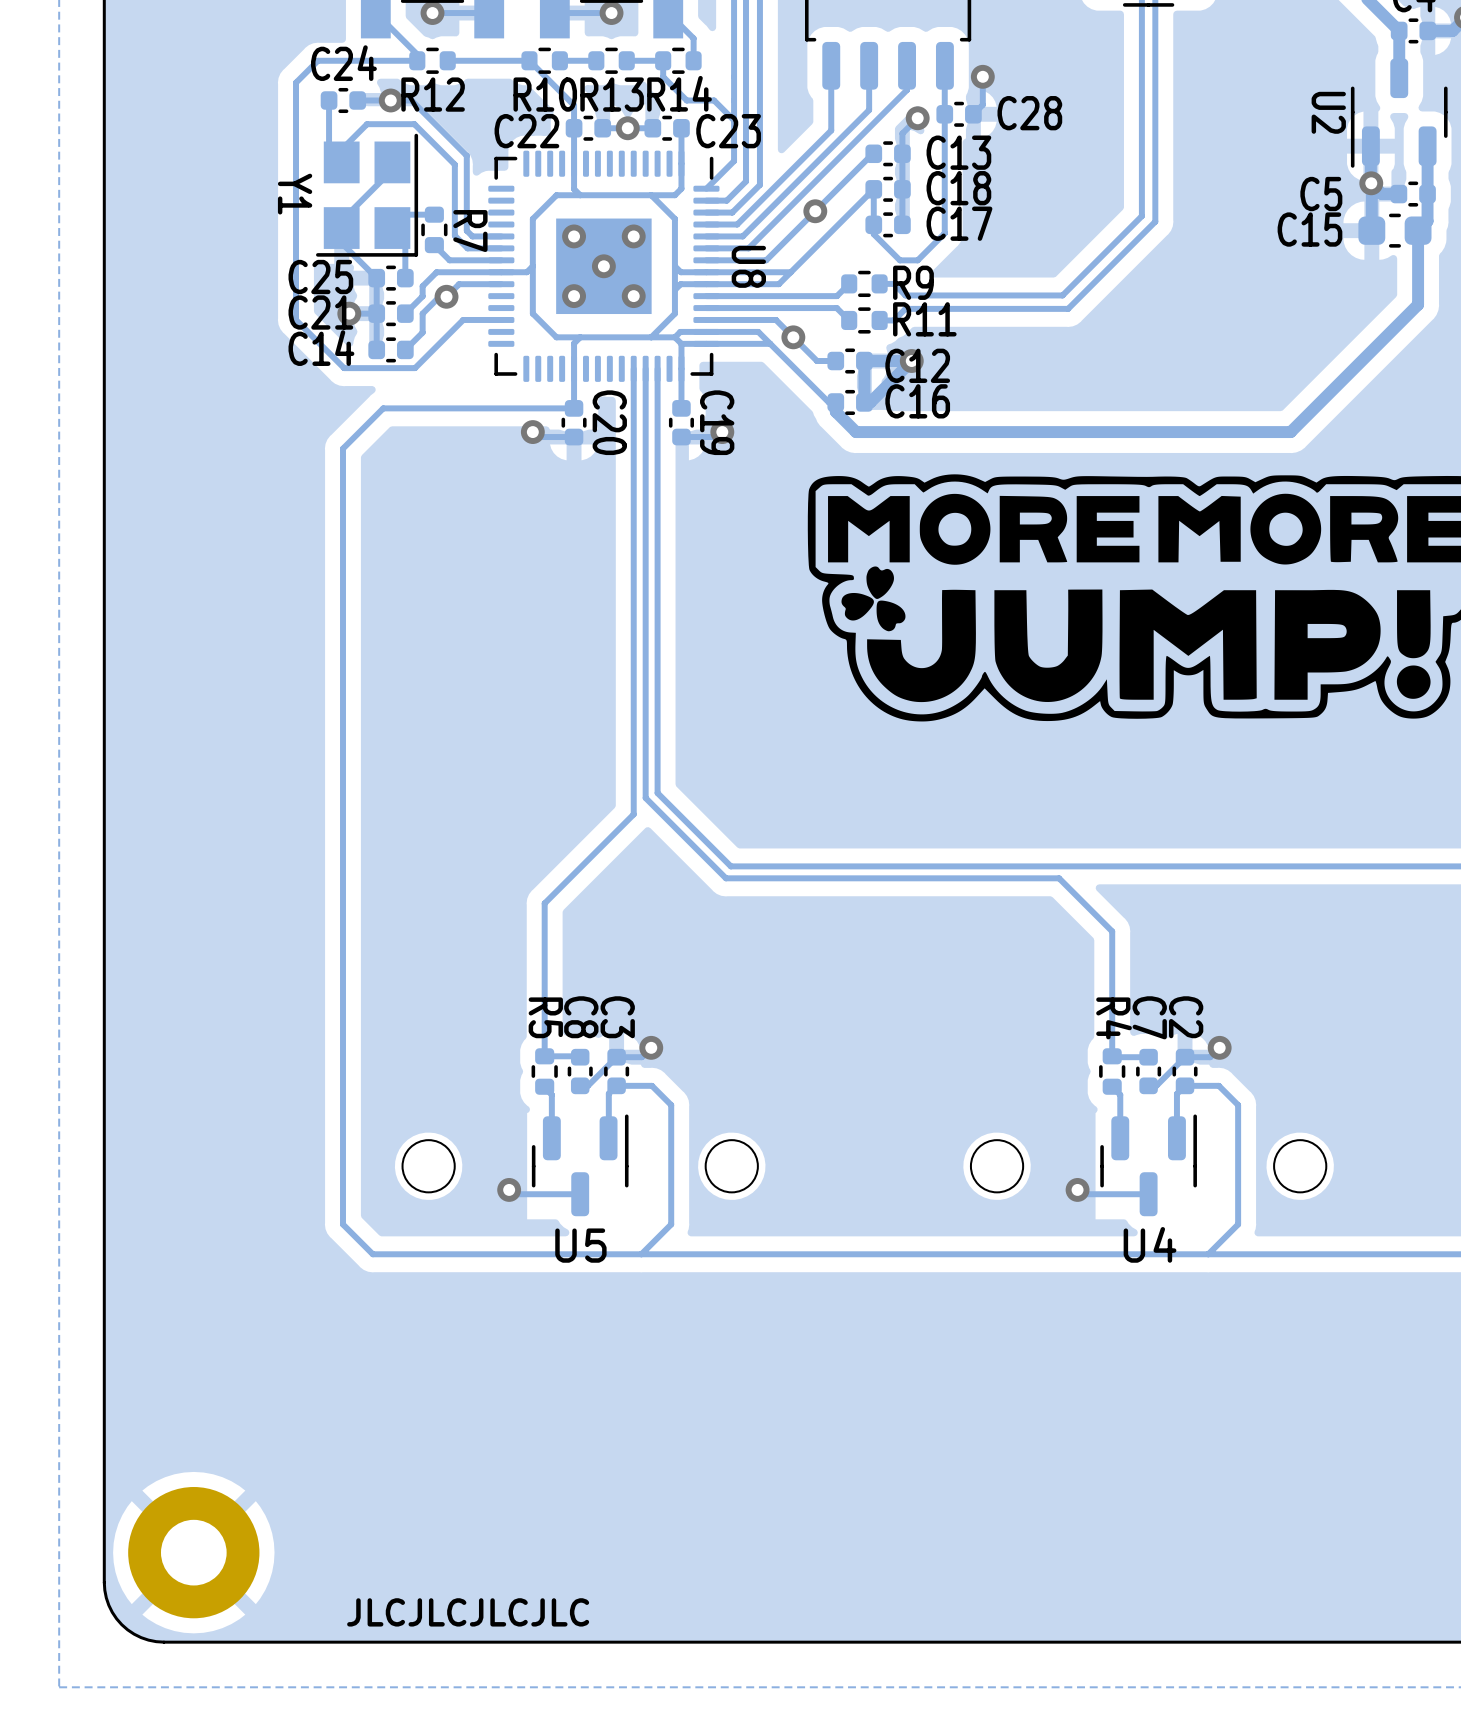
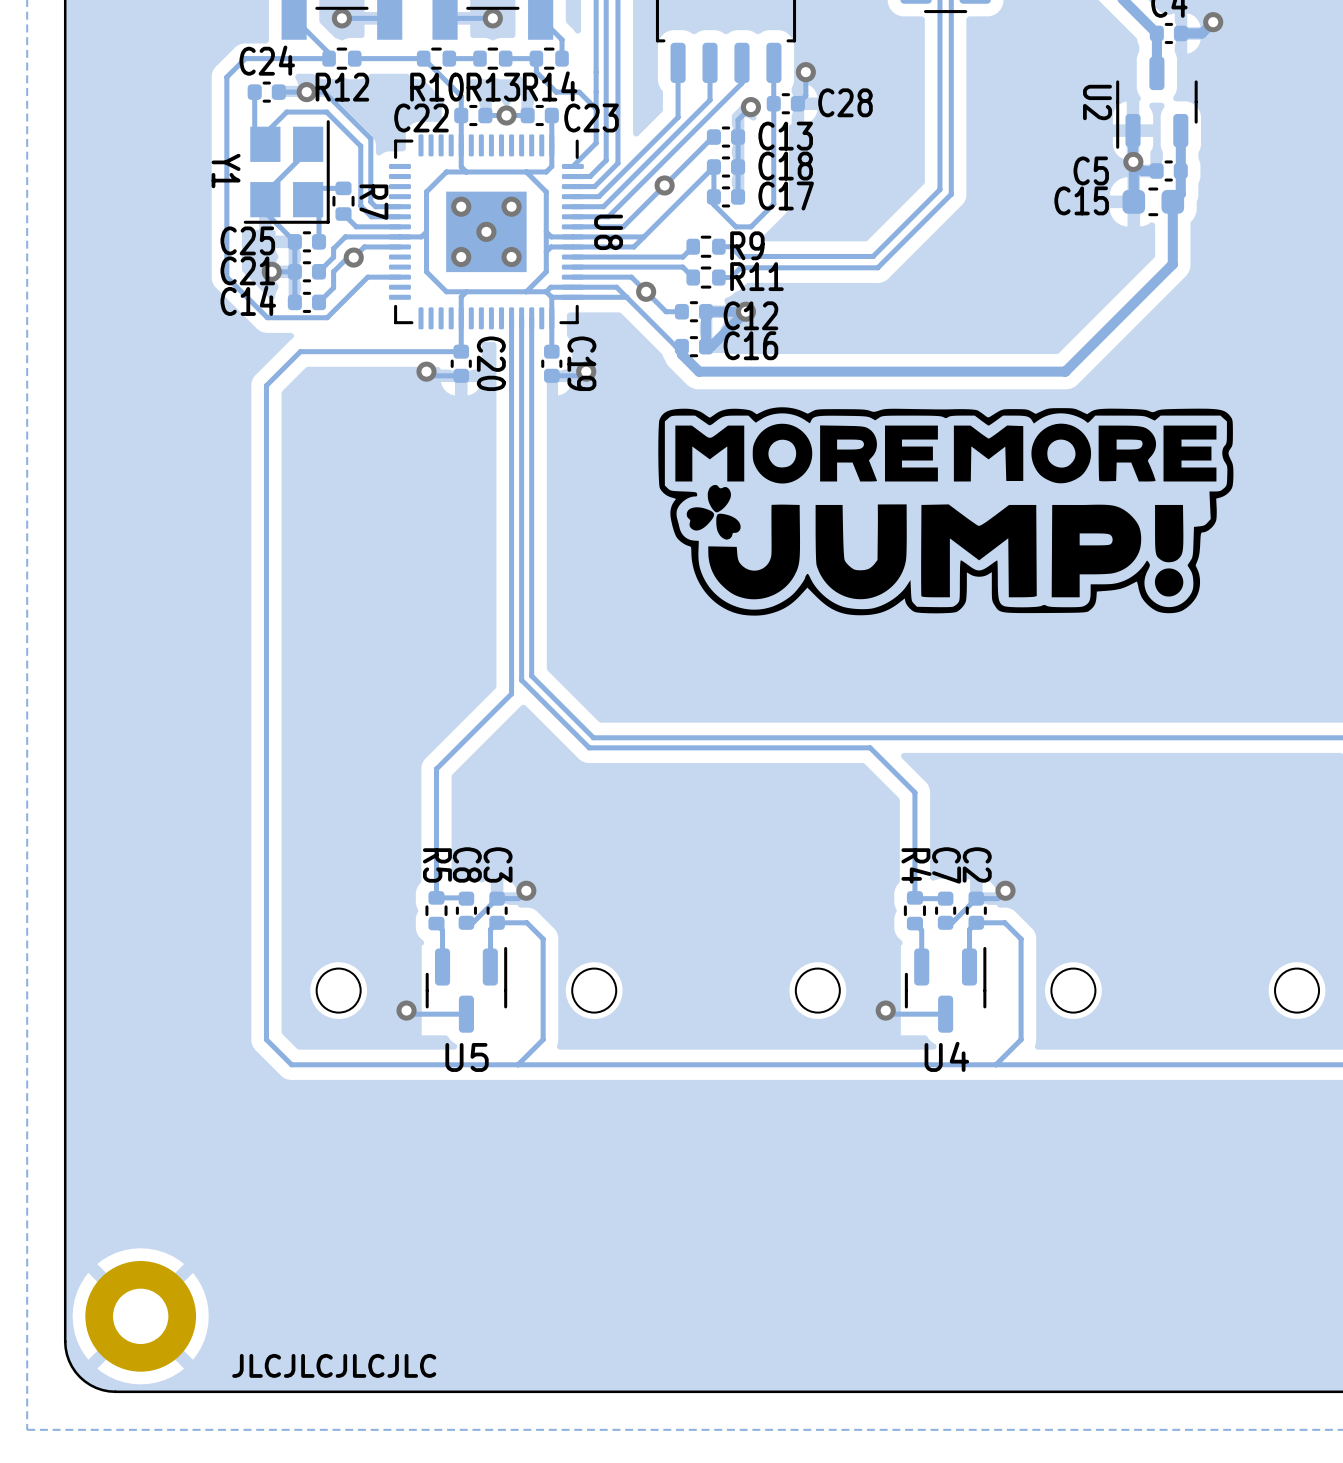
text position: JLCJLCJLCJLC (468, 1612) -> JLCJLCJLCJLC (334, 1365)

